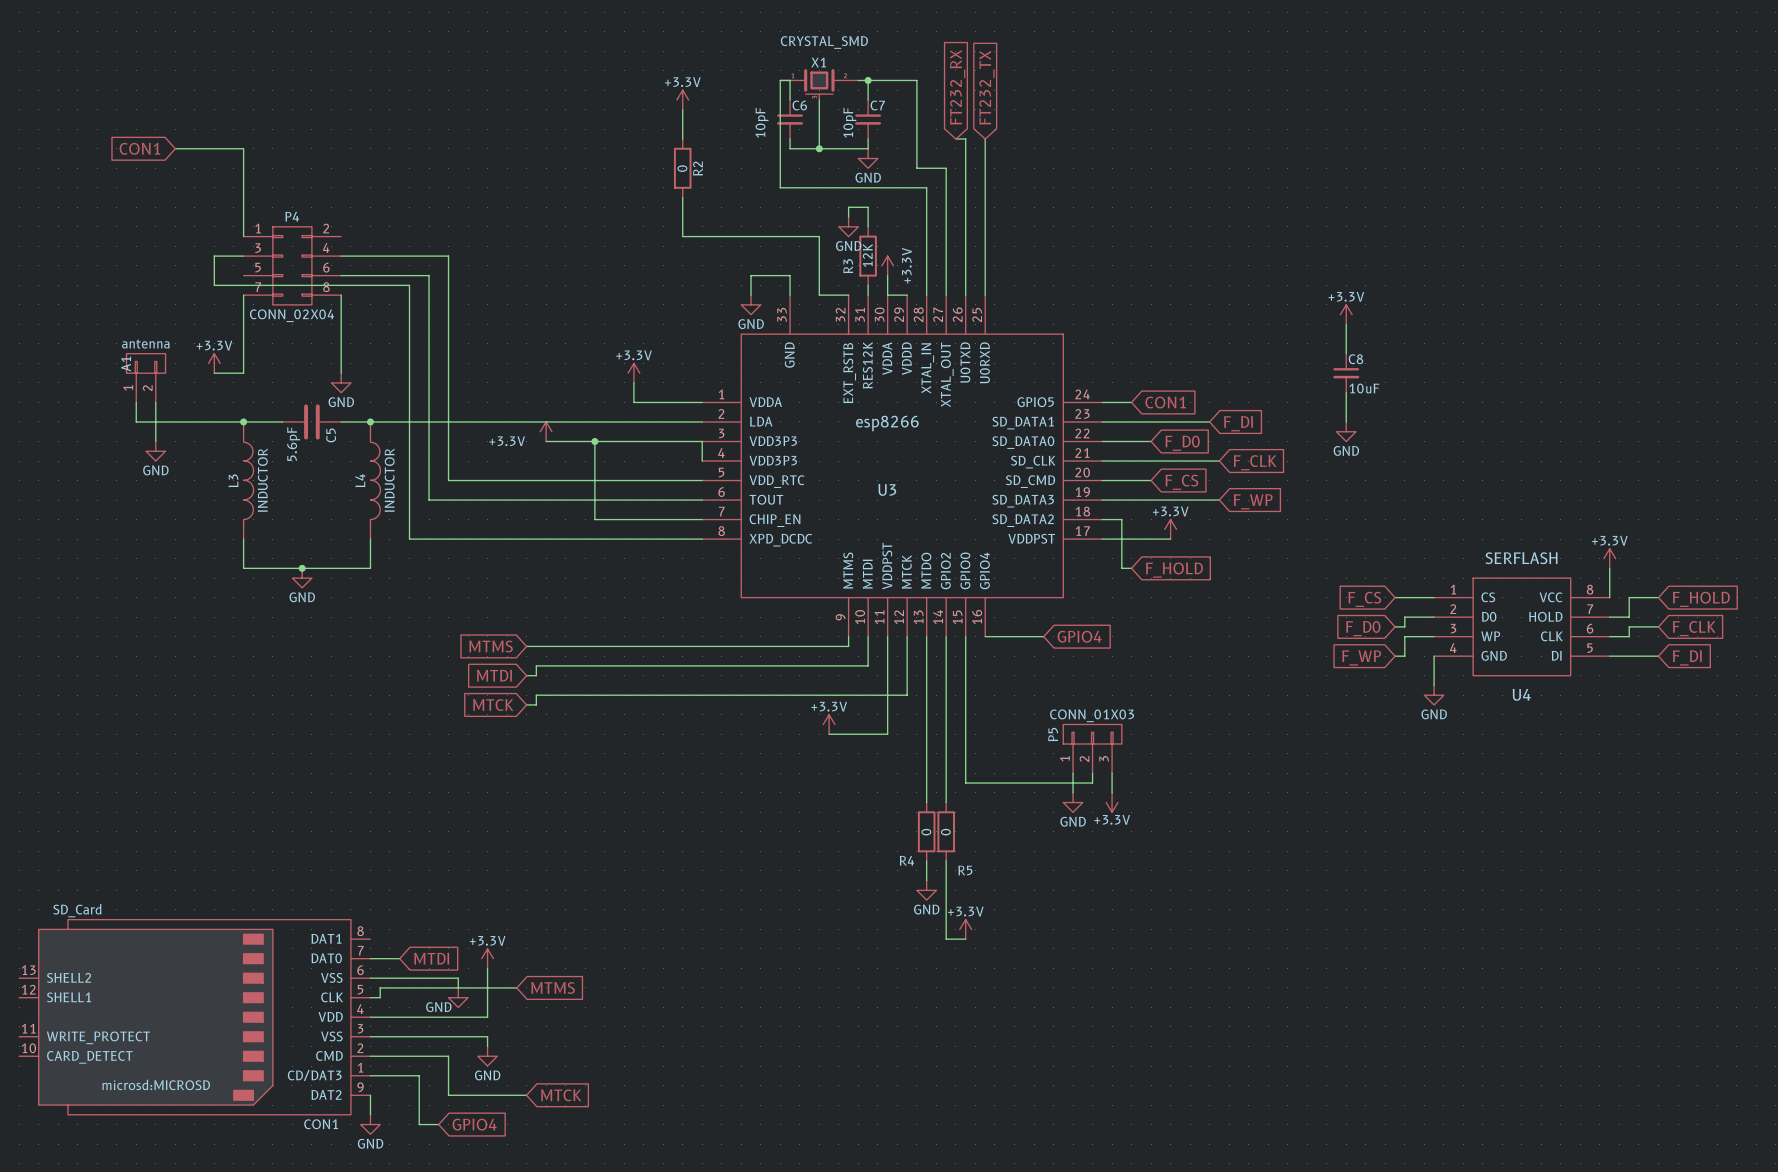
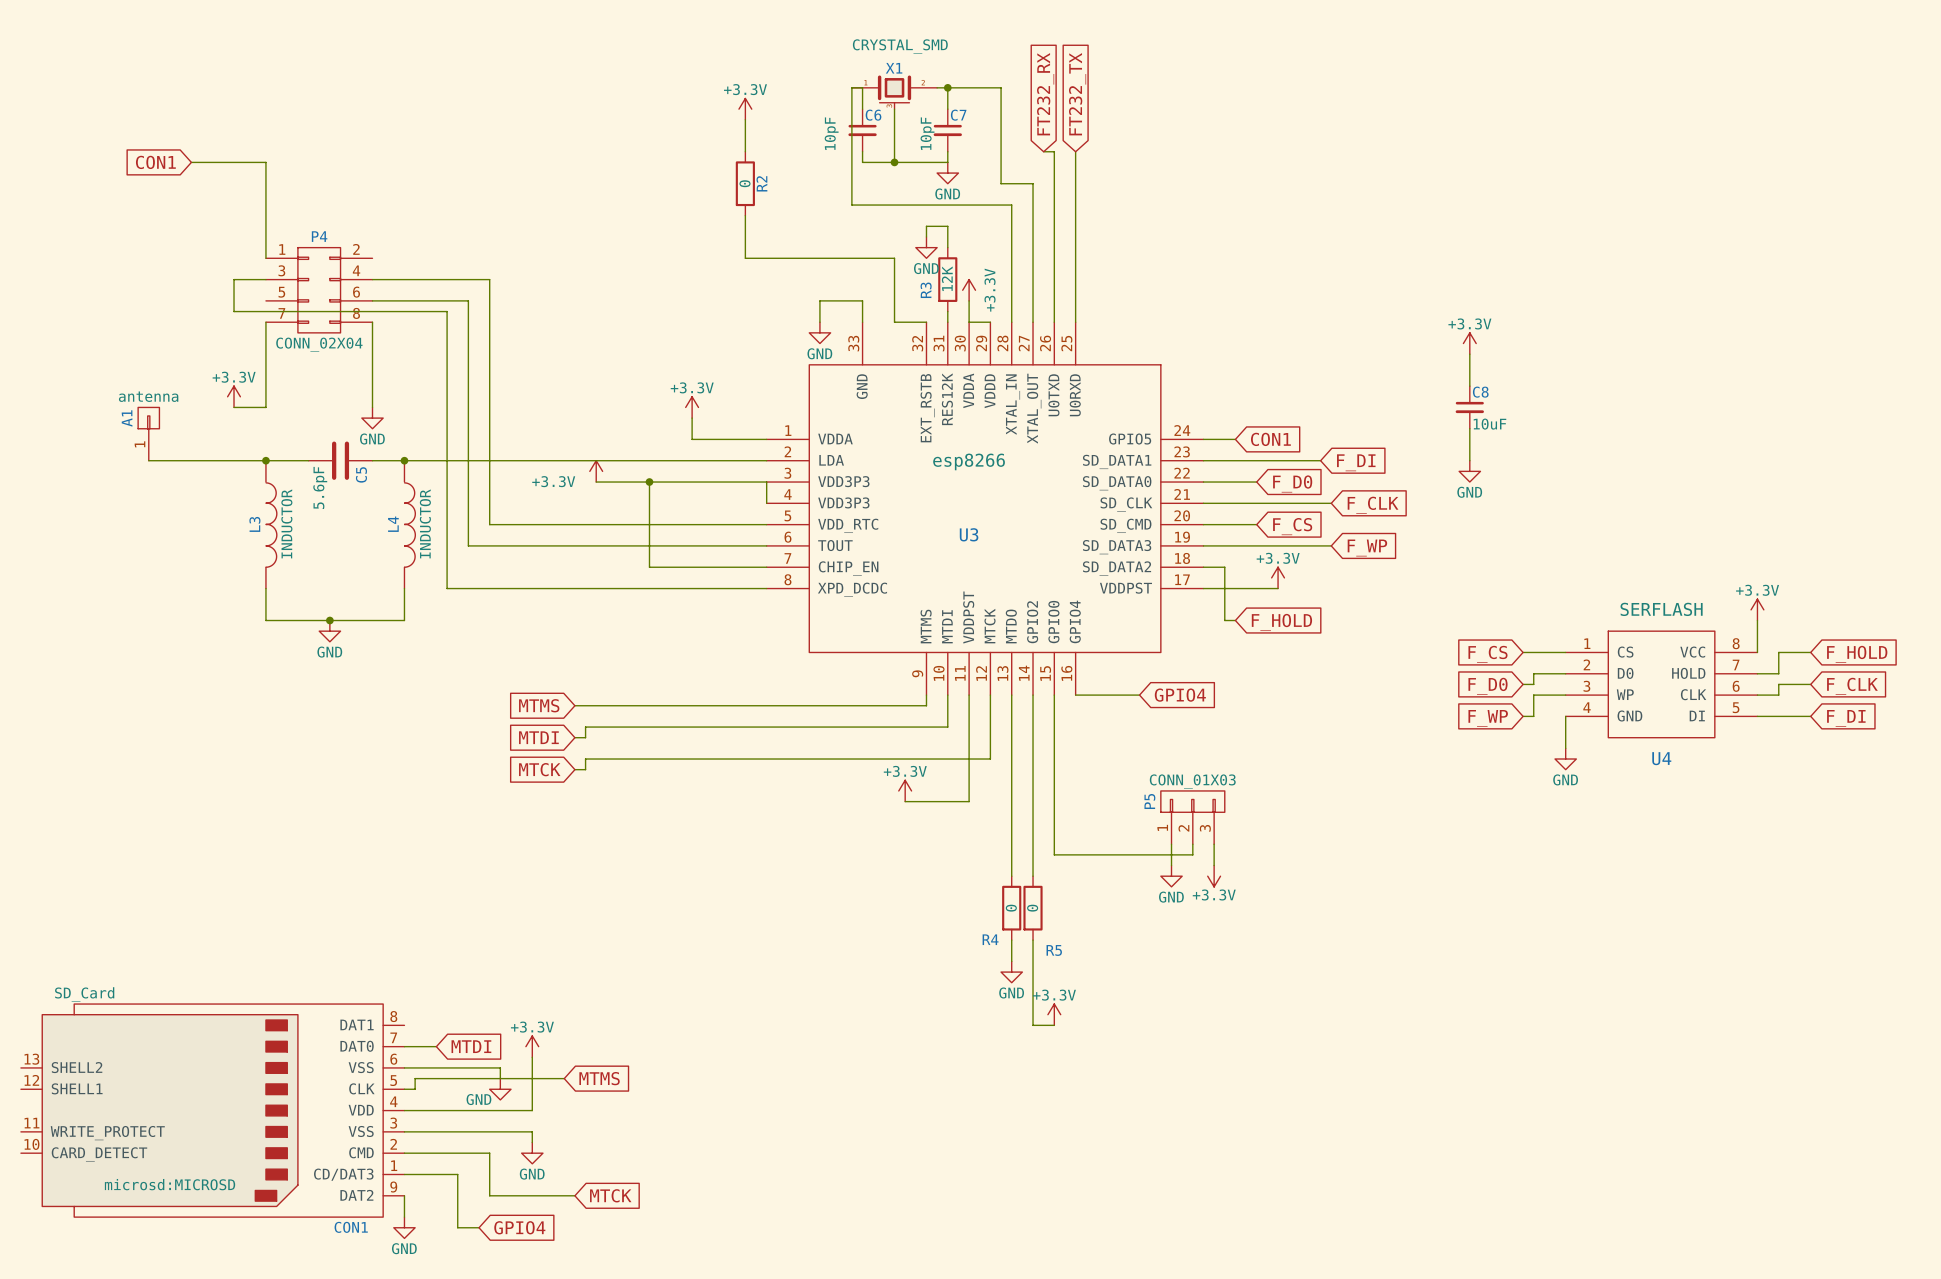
A1 symbol: [126, 353, 166, 403] -> [138, 407, 160, 461]
wire: (155, 402) (155, 441) -> none
power symbol: GND (155, 451) -> none

